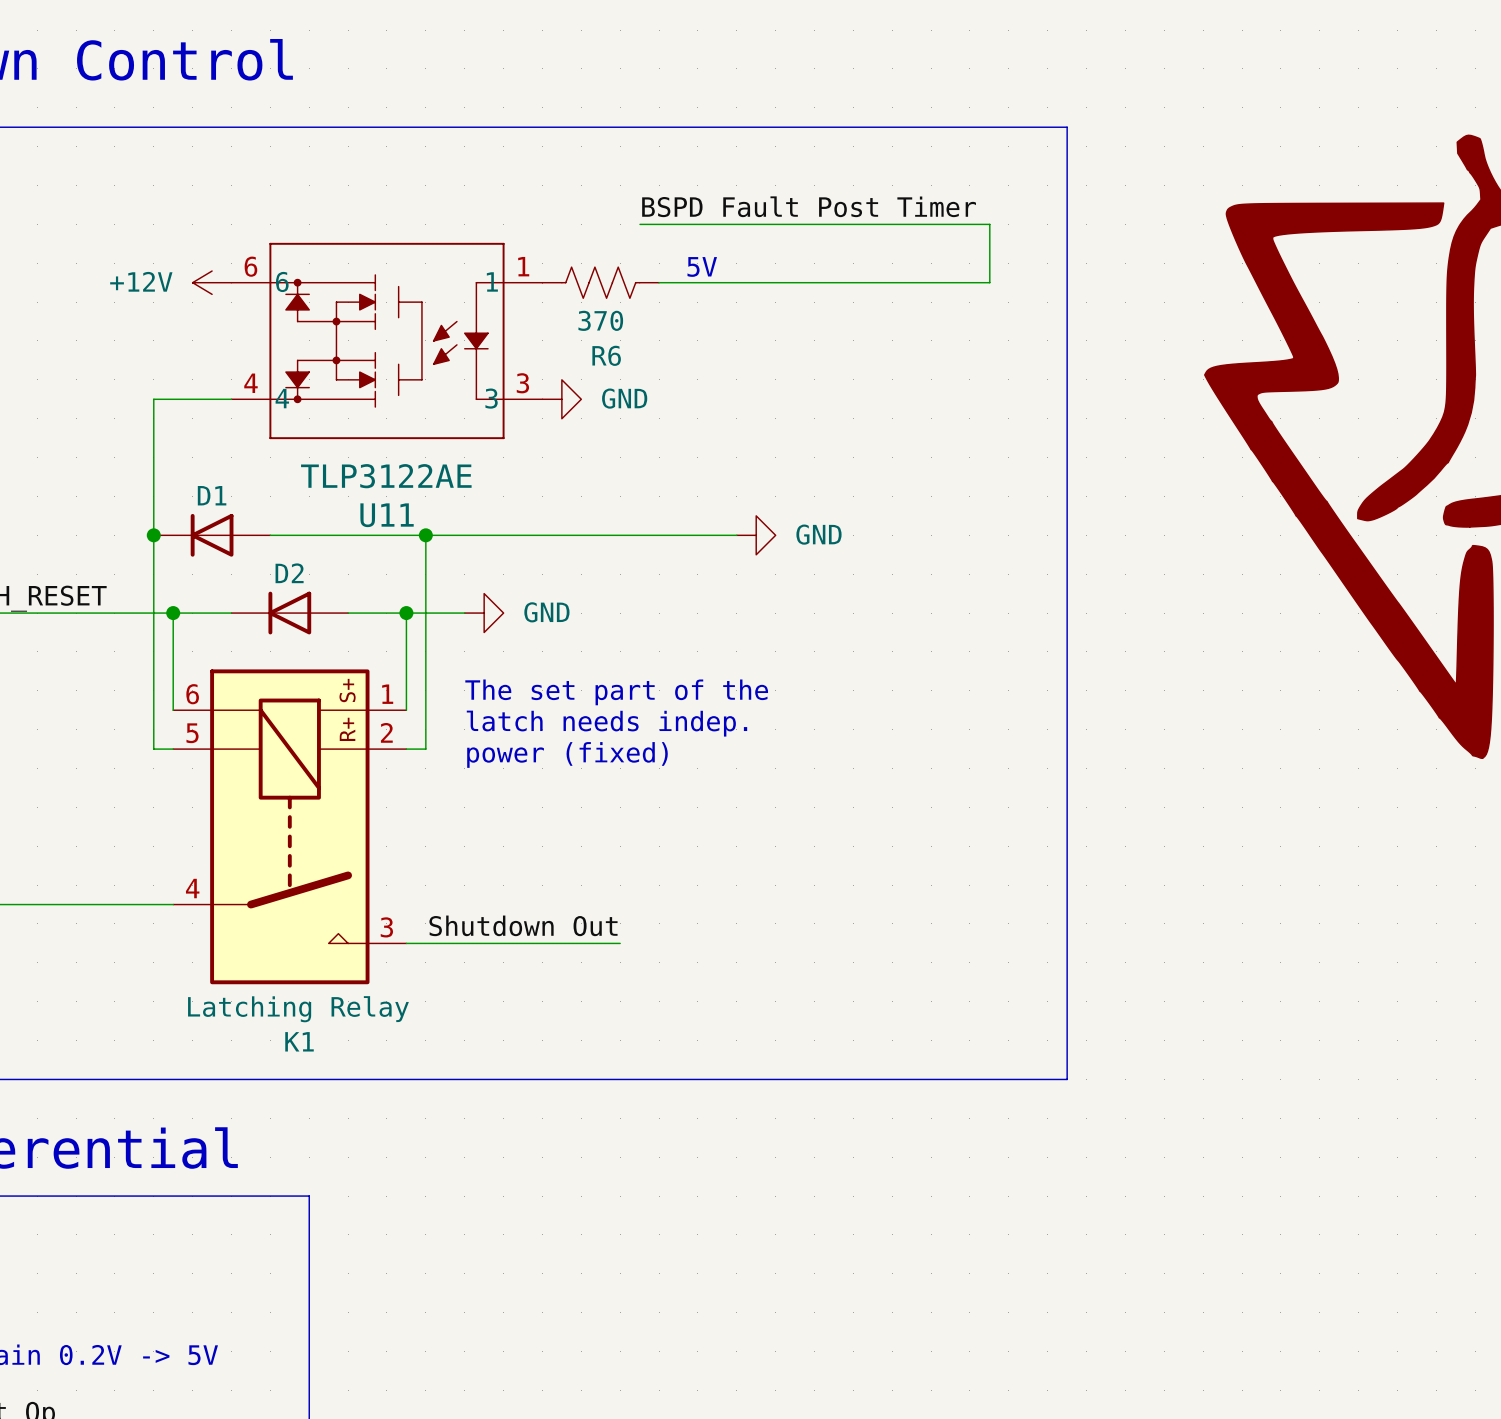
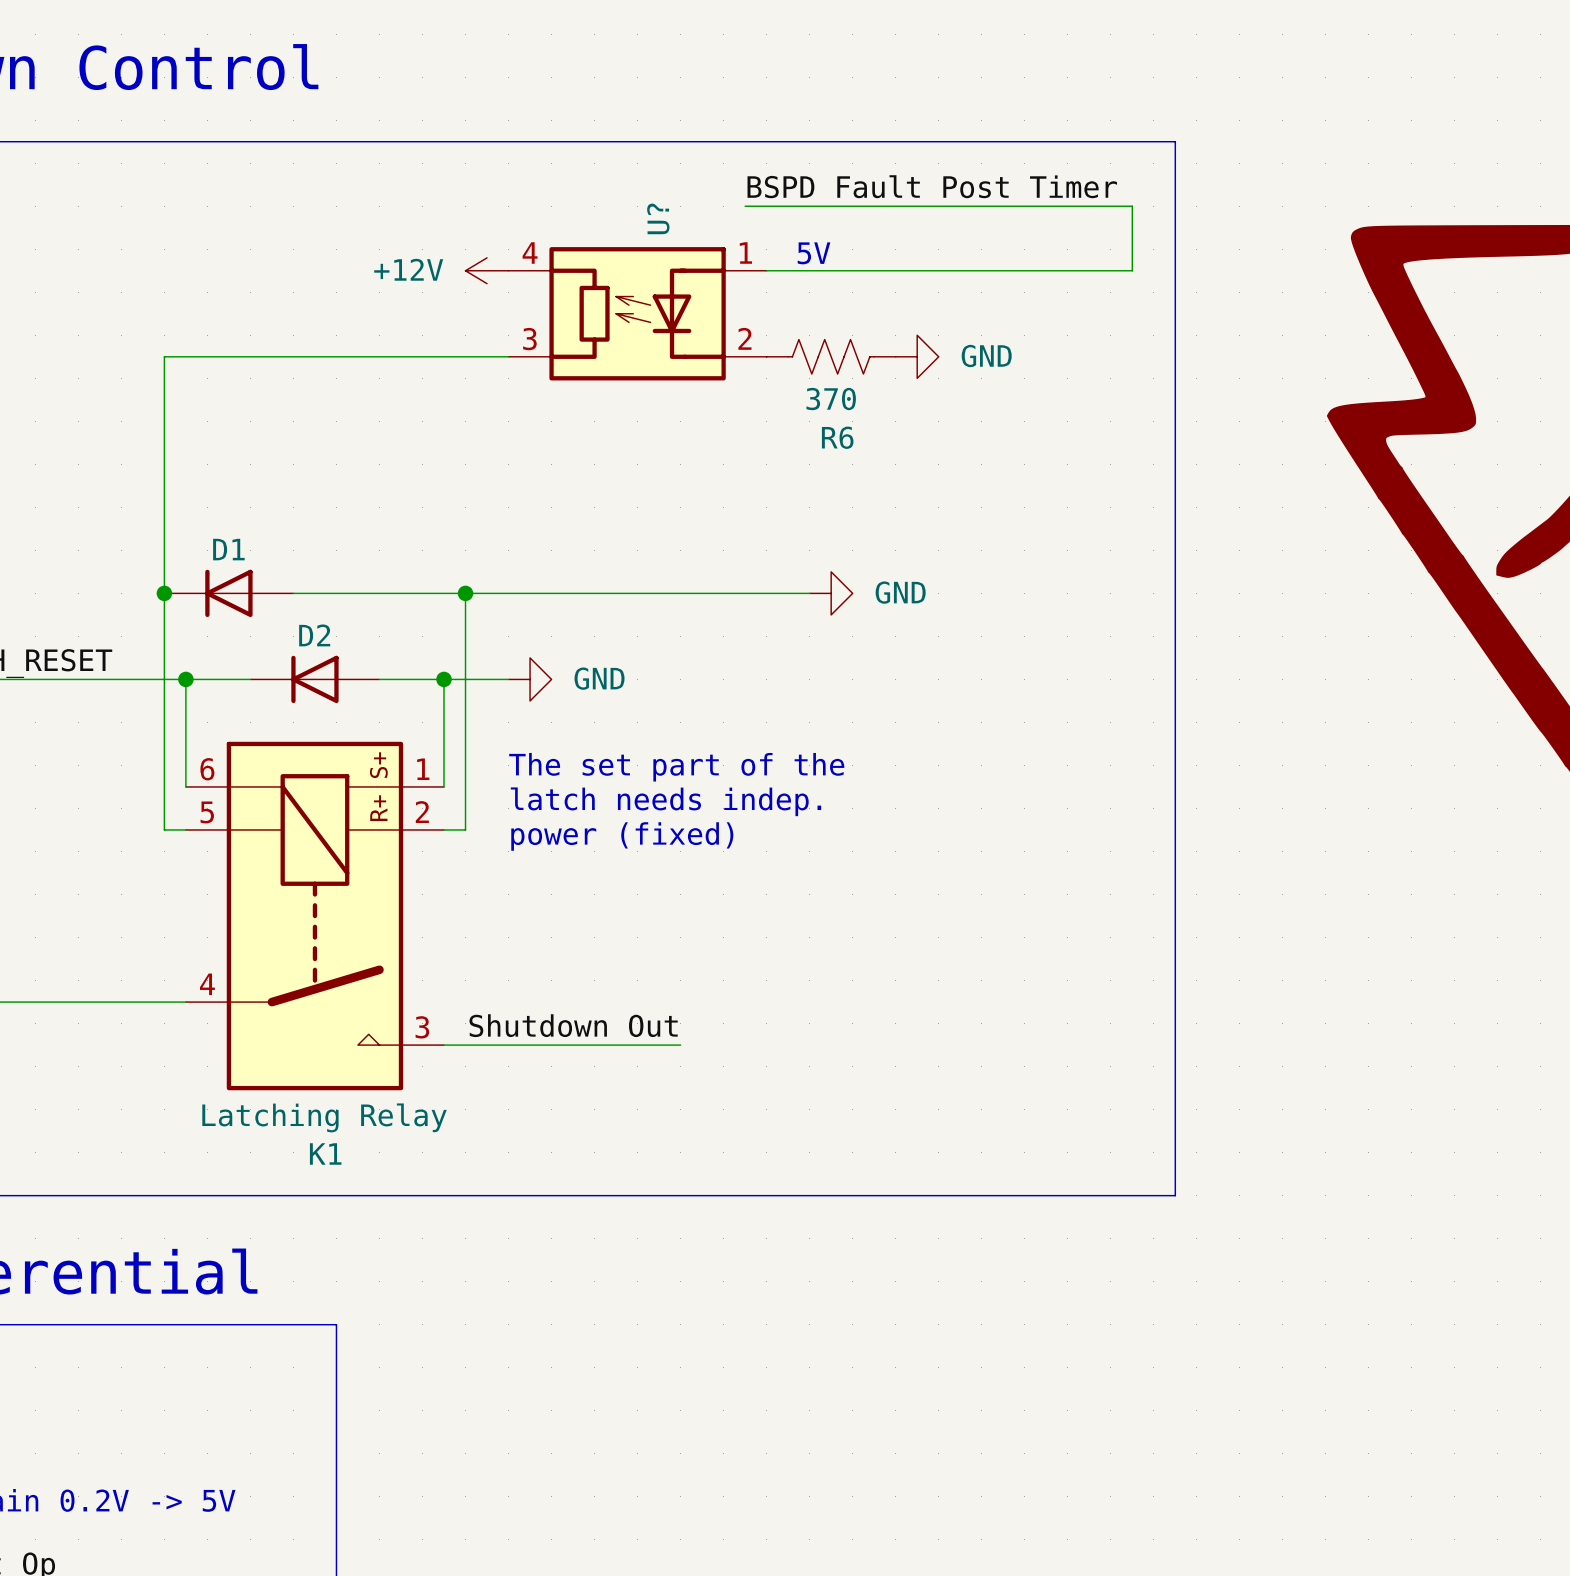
wire: none -> (745, 206) (1132, 206) (1132, 270) (766, 270)
label position: BSPD Fault Post Timer (809, 206) -> BSPD Fault Post Timer (932, 186)
wire: (640, 224) (989, 224) (989, 282) (659, 282) -> none
text position: 5V (702, 266) -> 5V (814, 253)
power symbol position: +12V (212, 282) -> +12V (487, 270)
U?: none -> (637, 313)
R6 position: (600, 282) -> (831, 356)
U11: TLP3122AE (386, 340) -> none
wire: (153, 399) (231, 399) -> (164, 442) (164, 356) (508, 356)
power symbol position: GND (561, 399) -> GND (917, 356)

